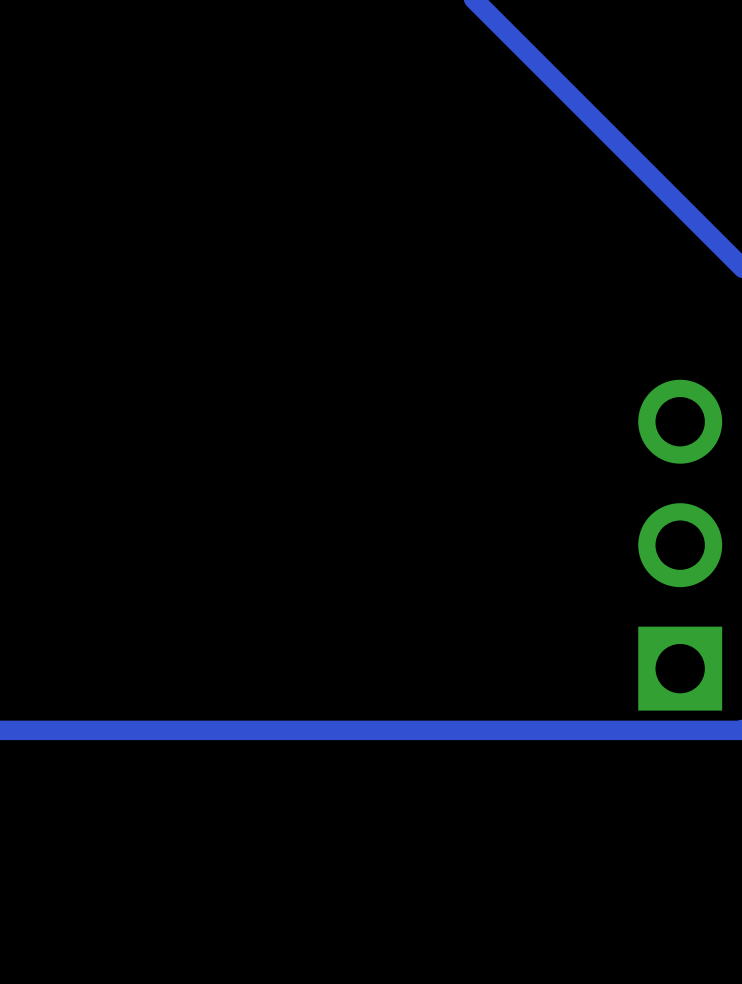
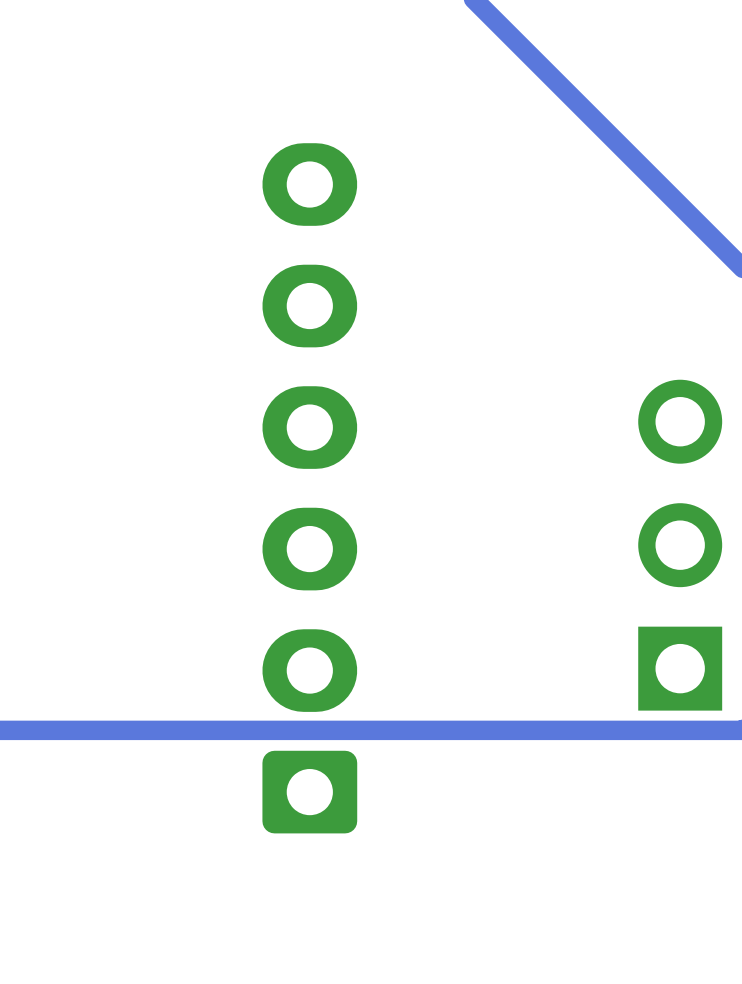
part: none -> (309, 488)

